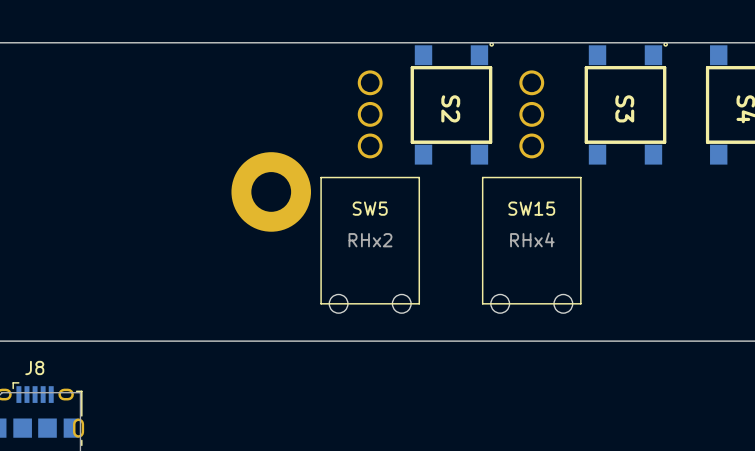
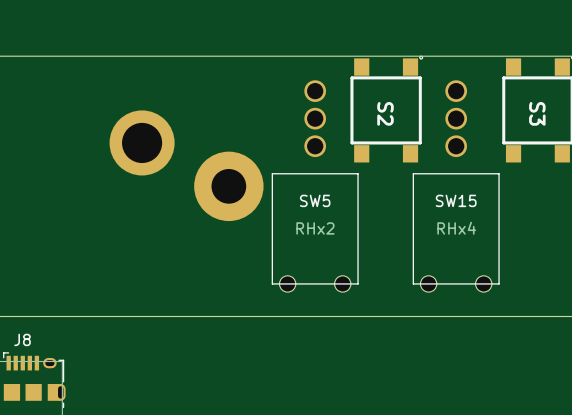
part: none -> (142, 142)

